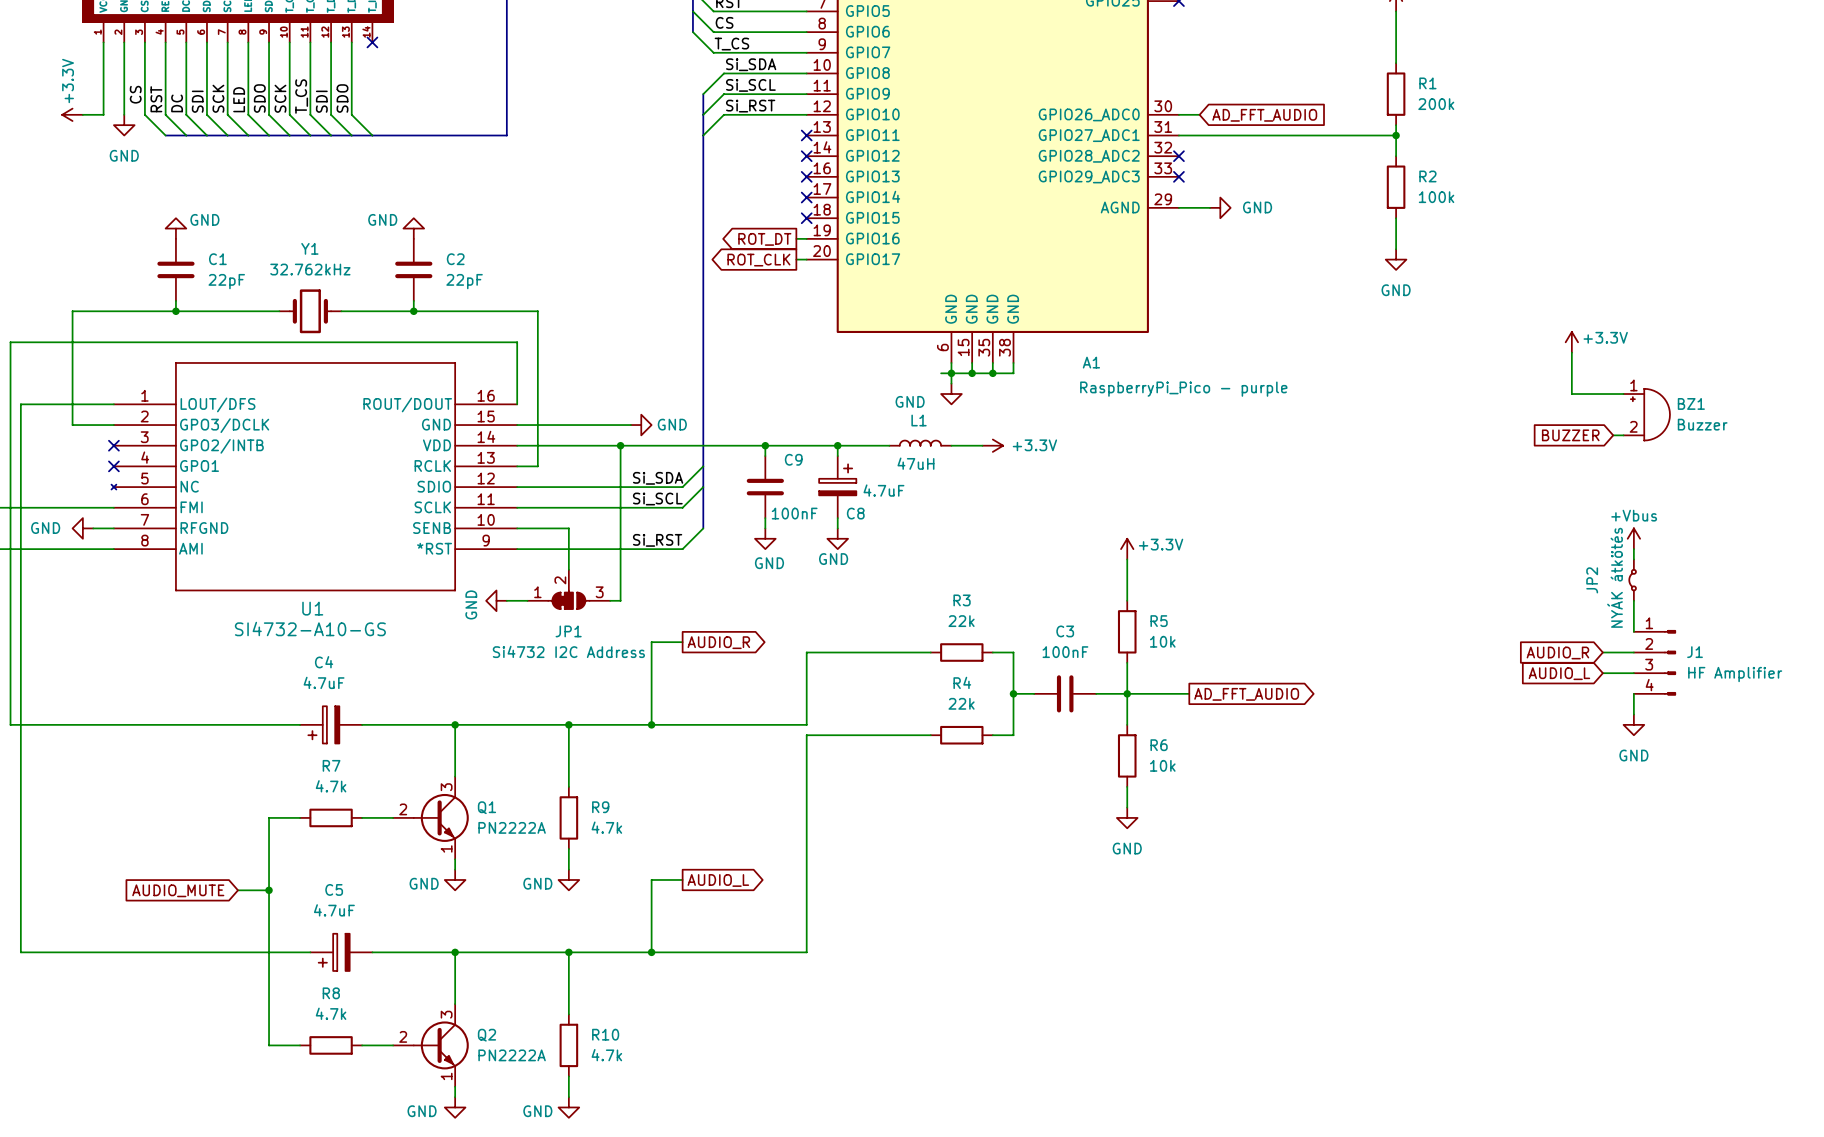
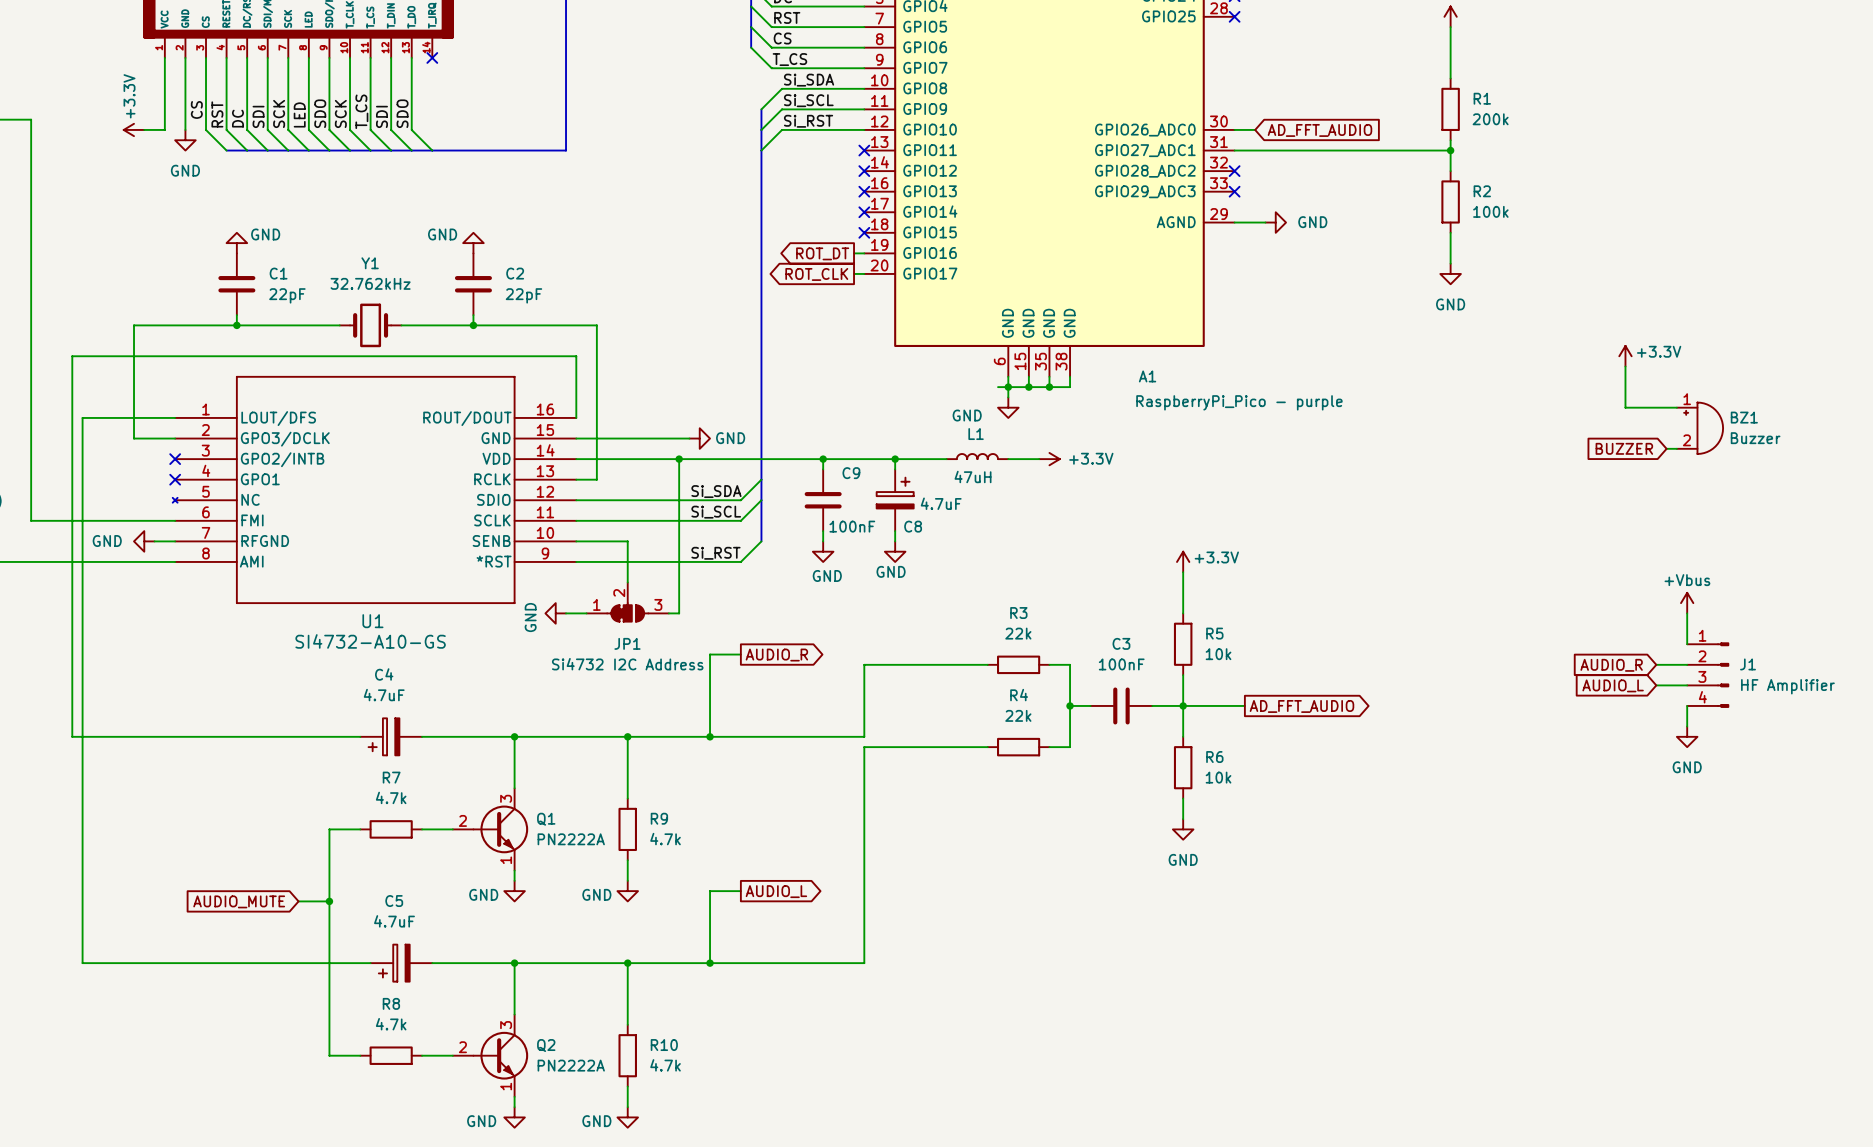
power symbol position: +Vbus (1633, 538) -> +Vbus (1687, 603)
wire: (1633, 549) (1633, 559) -> none
JP2: NYÁK átkötés (1632, 580) -> none

